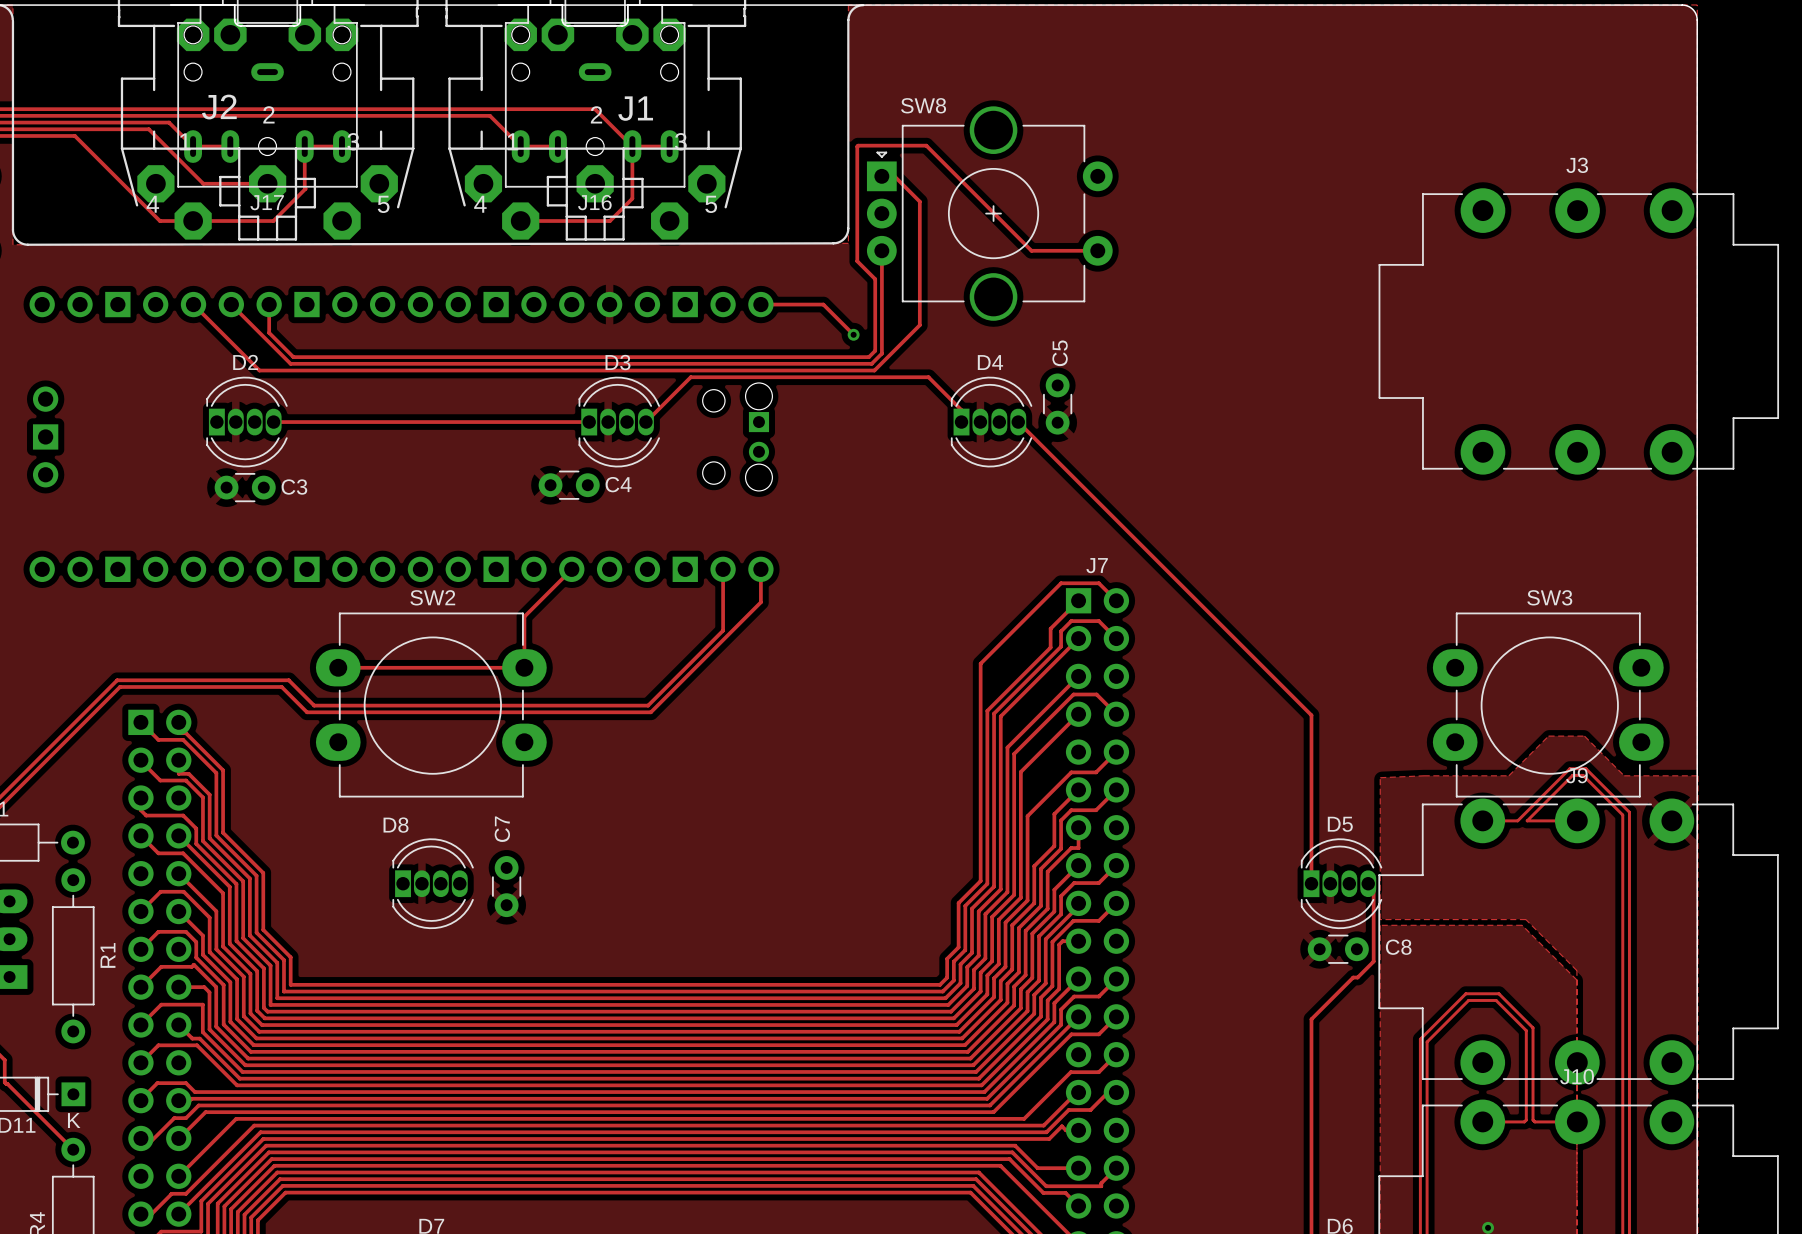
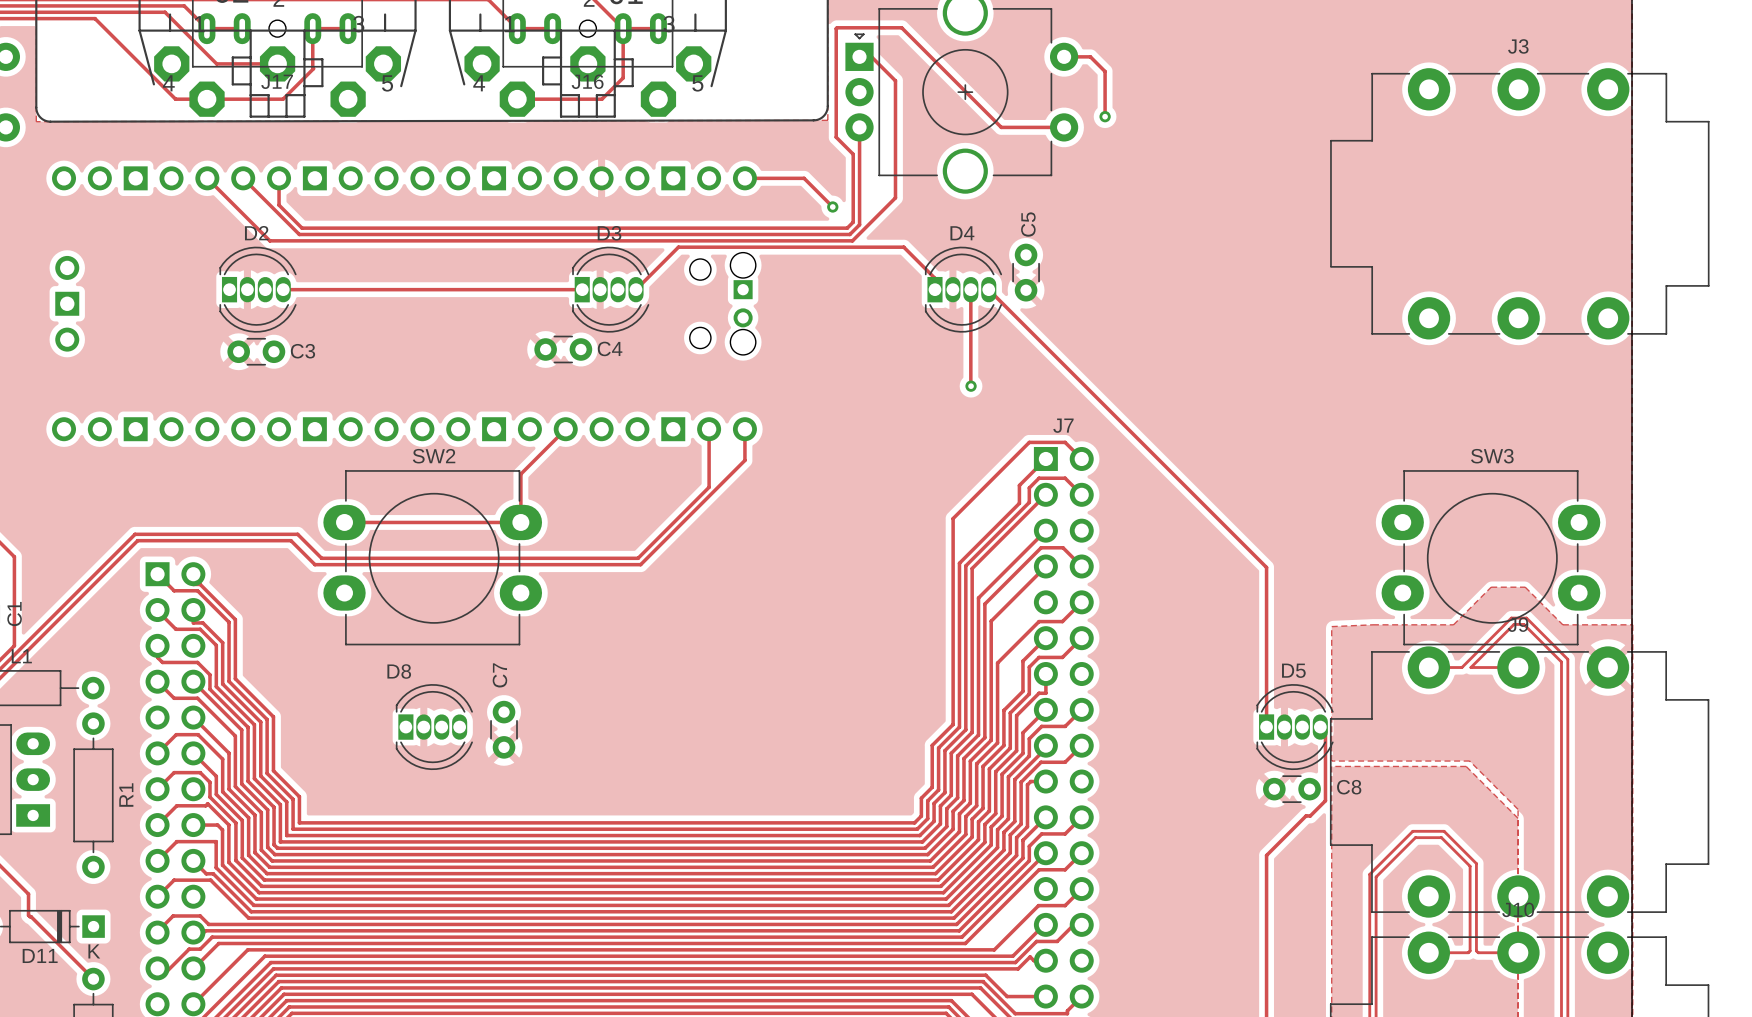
track: none -> (1064, 56) (1090, 56) (1105, 71) (1105, 112)
via: none -> (1105, 116)
track: none -> (970, 289) (971, 386)
via: none -> (971, 386)

